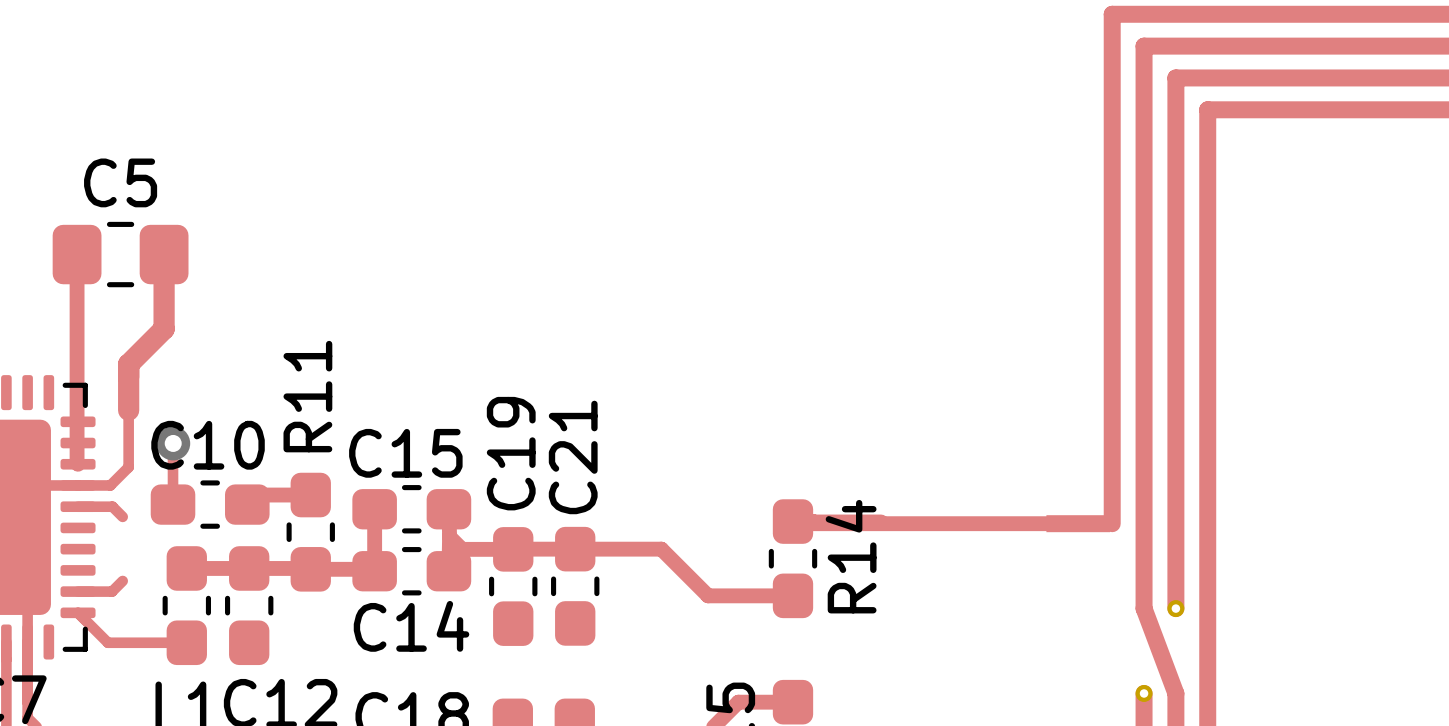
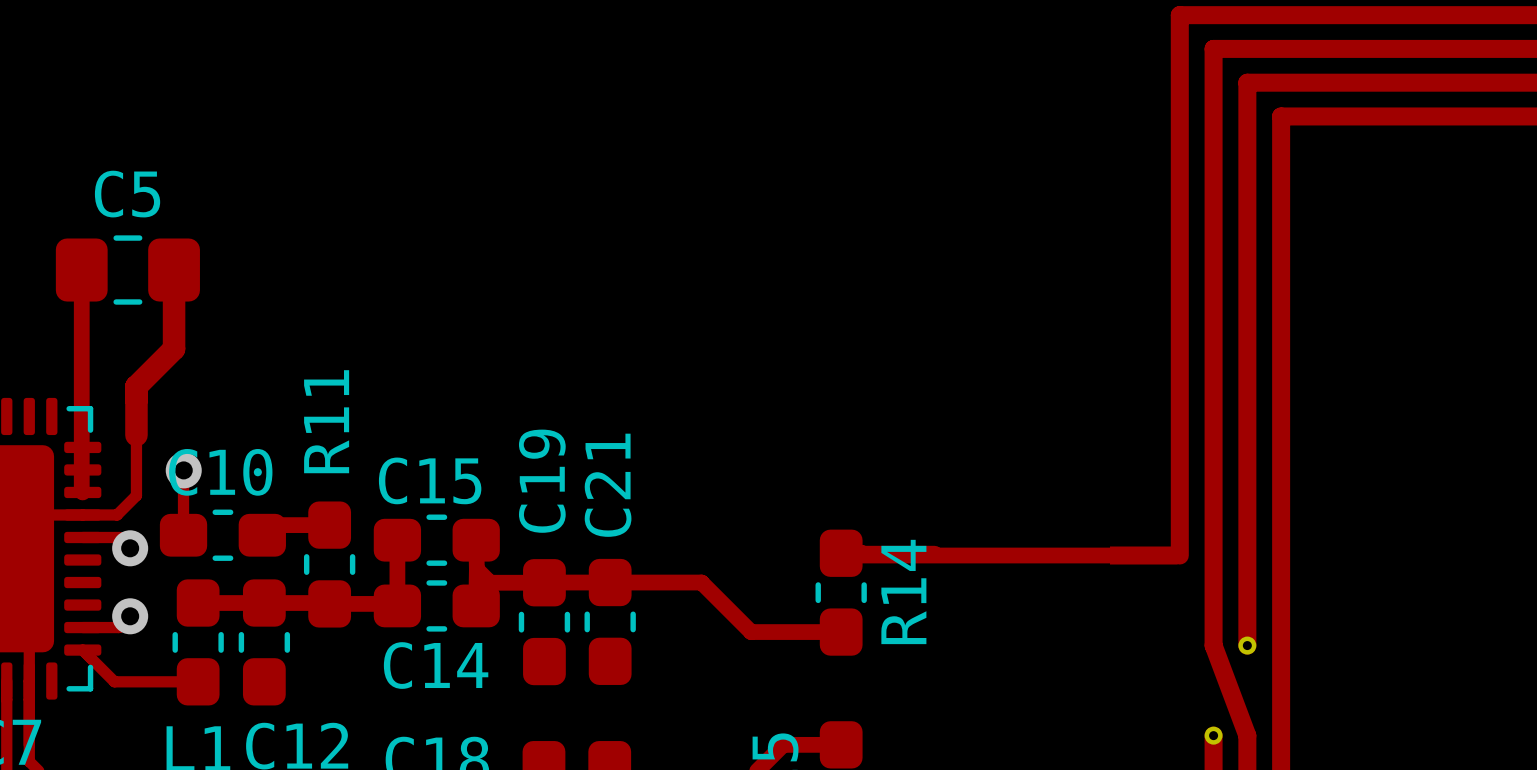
via: none -> (130, 548)
via: none -> (130, 616)

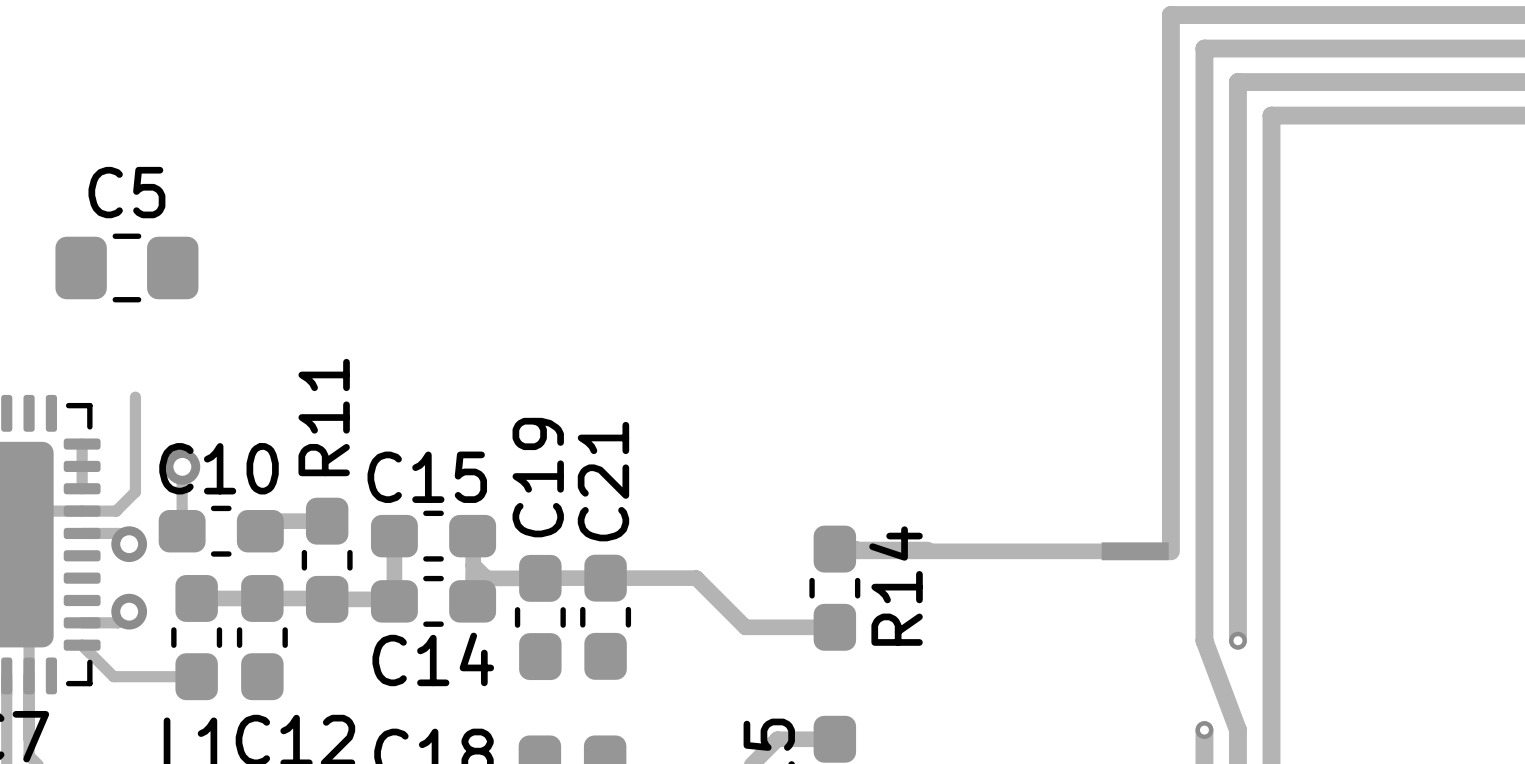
track: (81, 270) (82, 492) -> none
track: (174, 270) (174, 348) (136, 386) (136, 435) -> none

